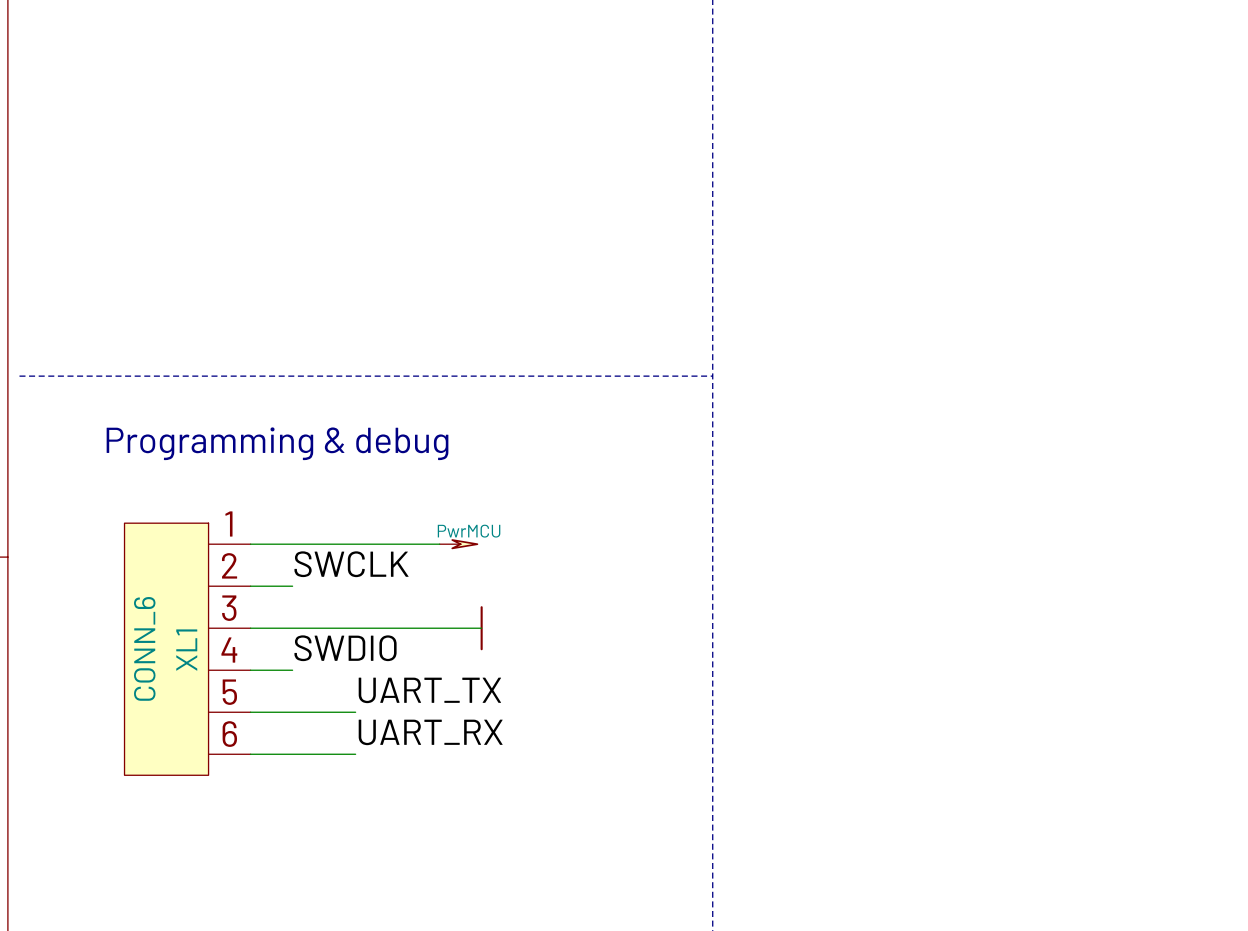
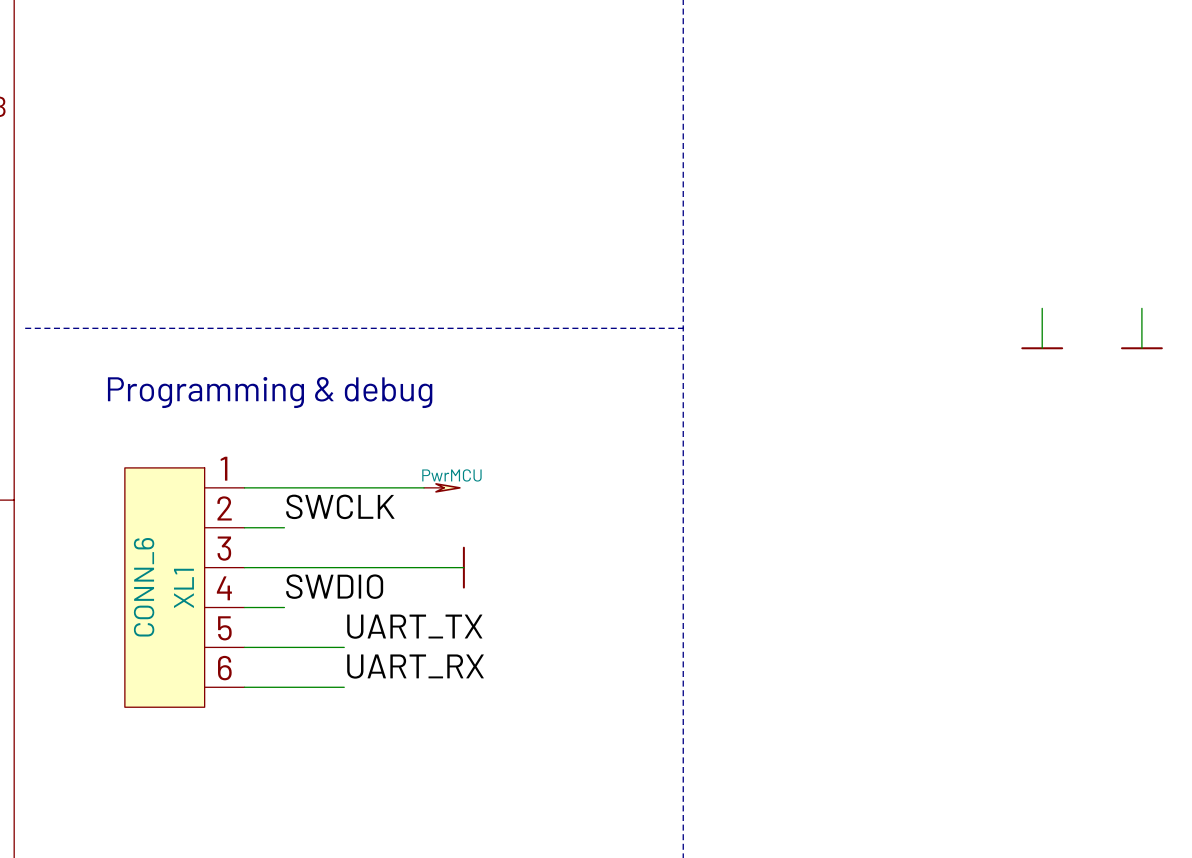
wire: none -> (1042, 308) (1042, 348)
wire: none -> (1141, 308) (1141, 348)
power symbol: none -> (1042, 348)
power symbol: none -> (1141, 348)

